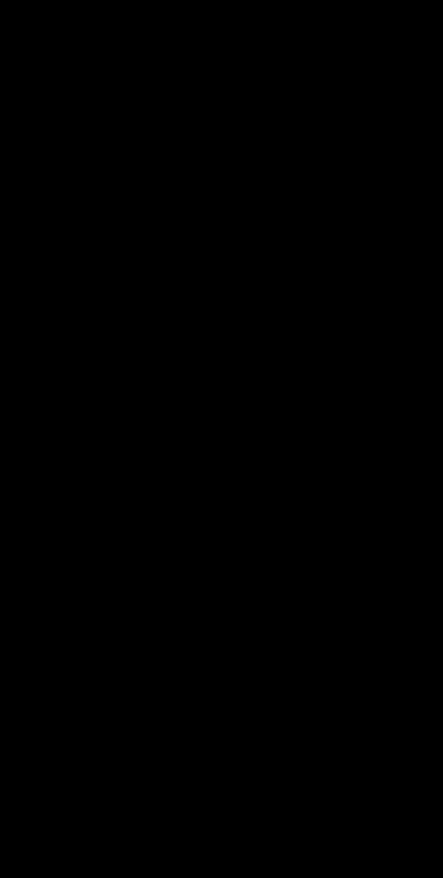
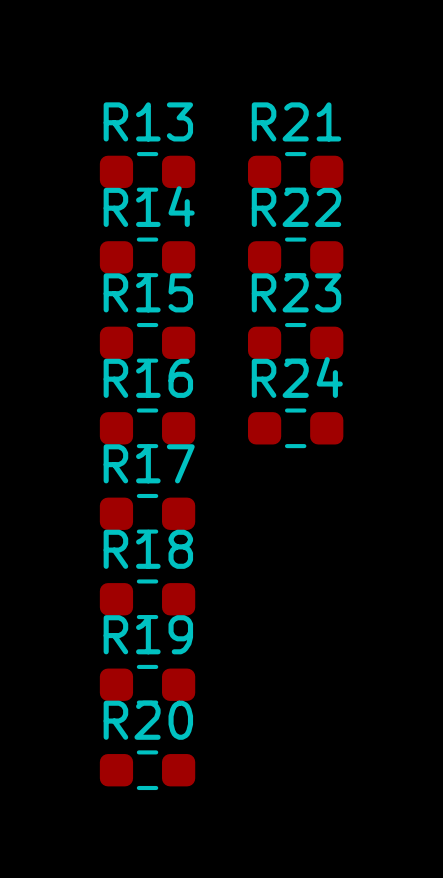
R13: none -> (147, 171)
R21: none -> (295, 171)
R14: none -> (147, 257)
R22: none -> (295, 257)
R15: none -> (147, 342)
R23: none -> (295, 342)
R16: none -> (147, 428)
R24: none -> (295, 428)
R17: none -> (147, 513)
R18: none -> (147, 599)
R19: none -> (147, 684)
R20: none -> (147, 770)

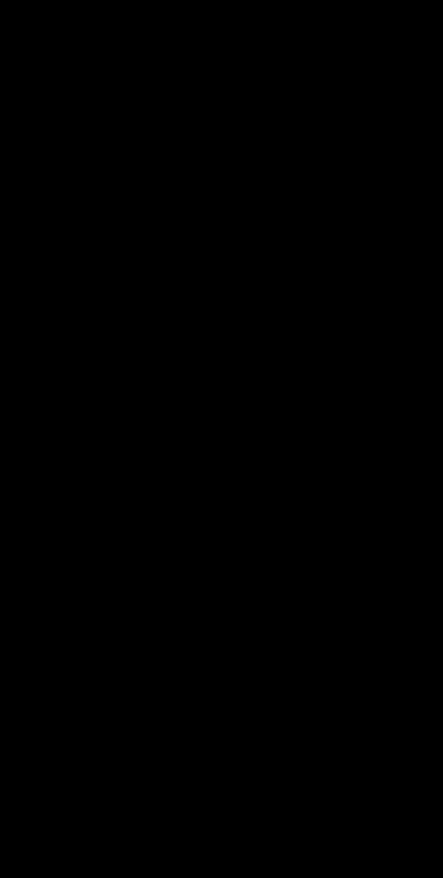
R13: (147, 171) -> none
R21: (295, 171) -> none
R14: (147, 257) -> none
R22: (295, 257) -> none
R15: (147, 342) -> none
R23: (295, 342) -> none
R16: (147, 428) -> none
R24: (295, 428) -> none
R17: (147, 513) -> none
R18: (147, 599) -> none
R19: (147, 684) -> none
R20: (147, 770) -> none

